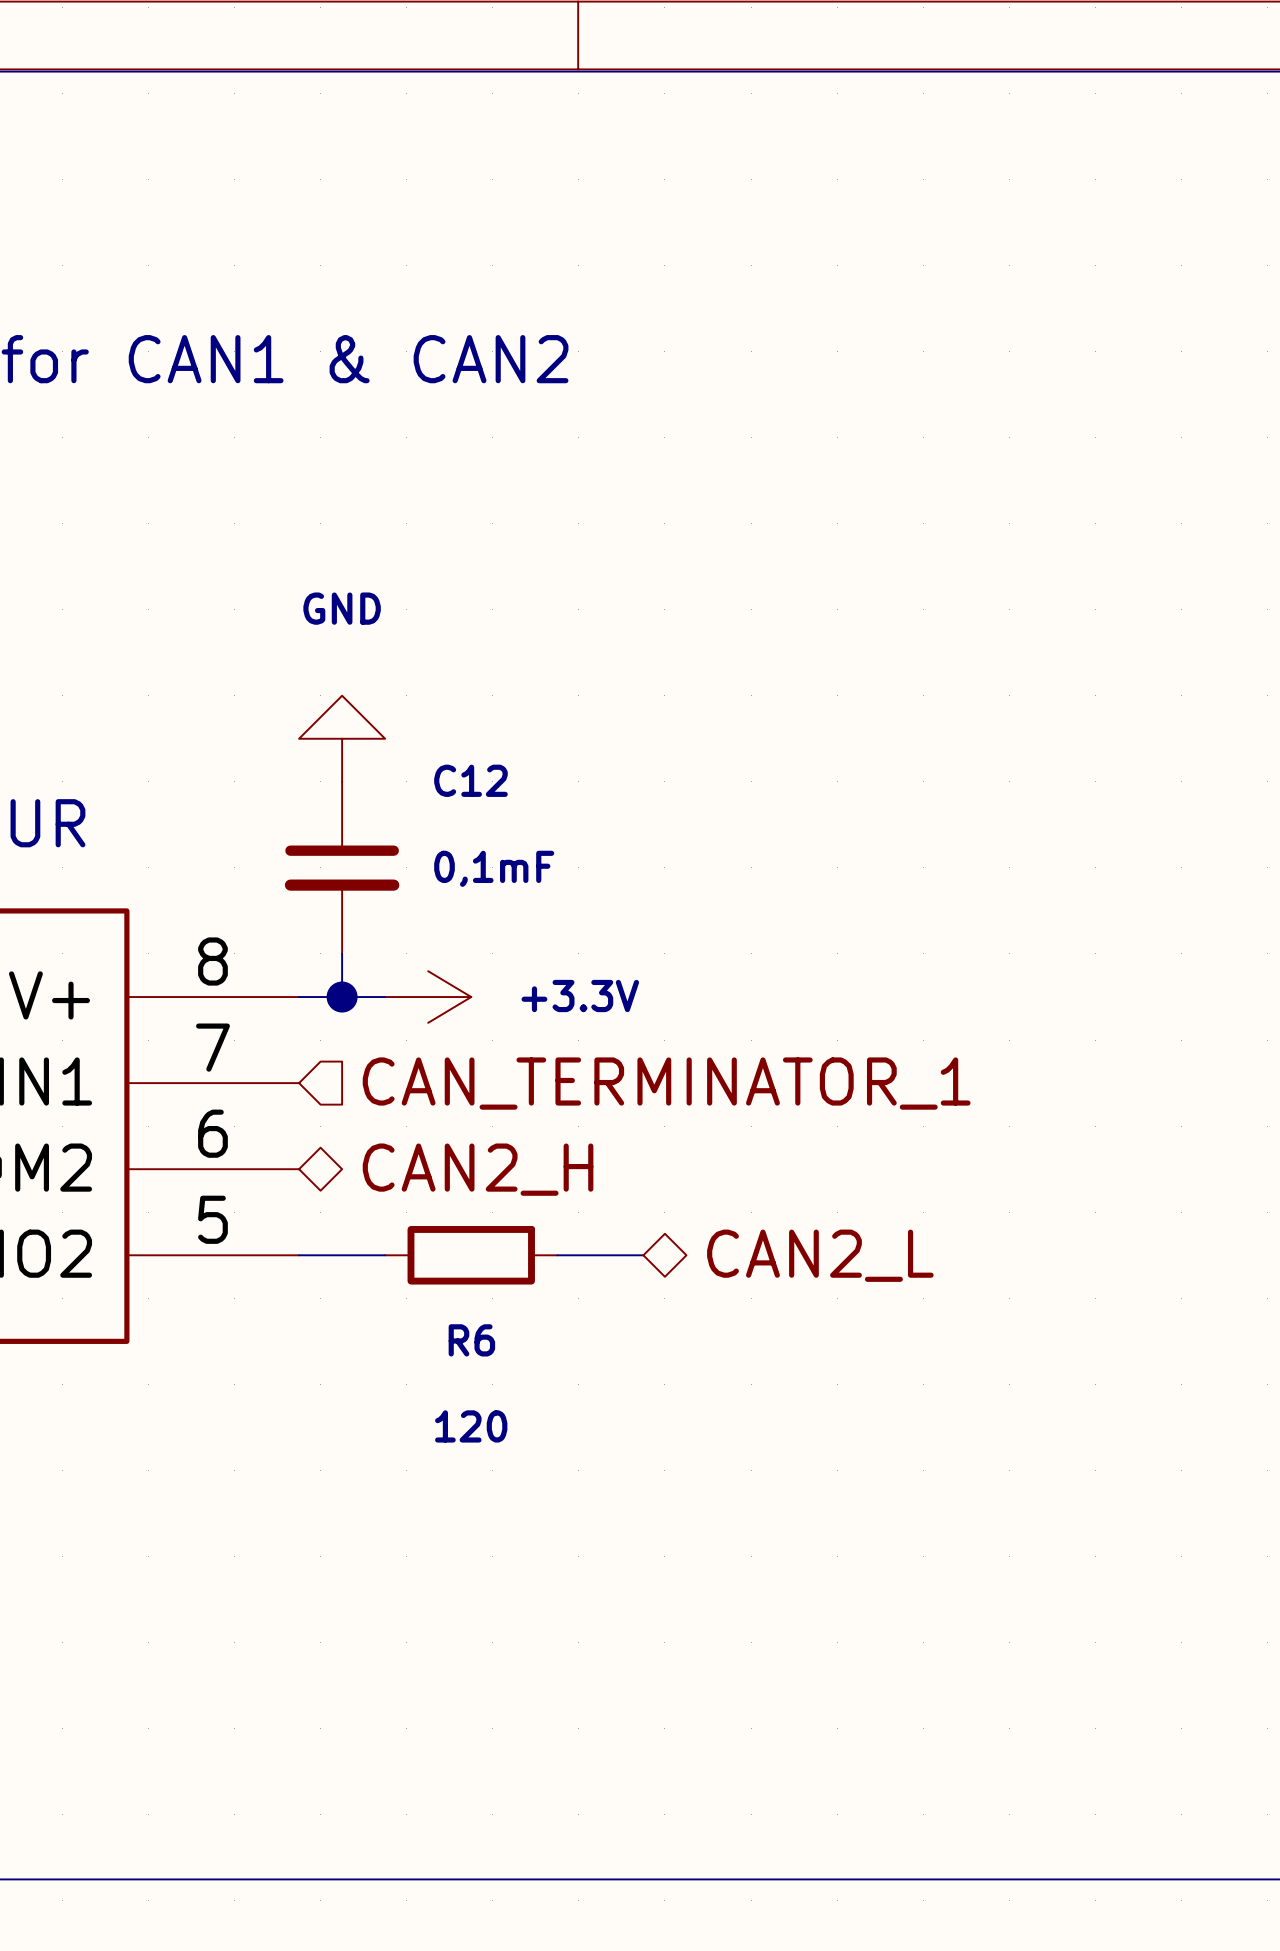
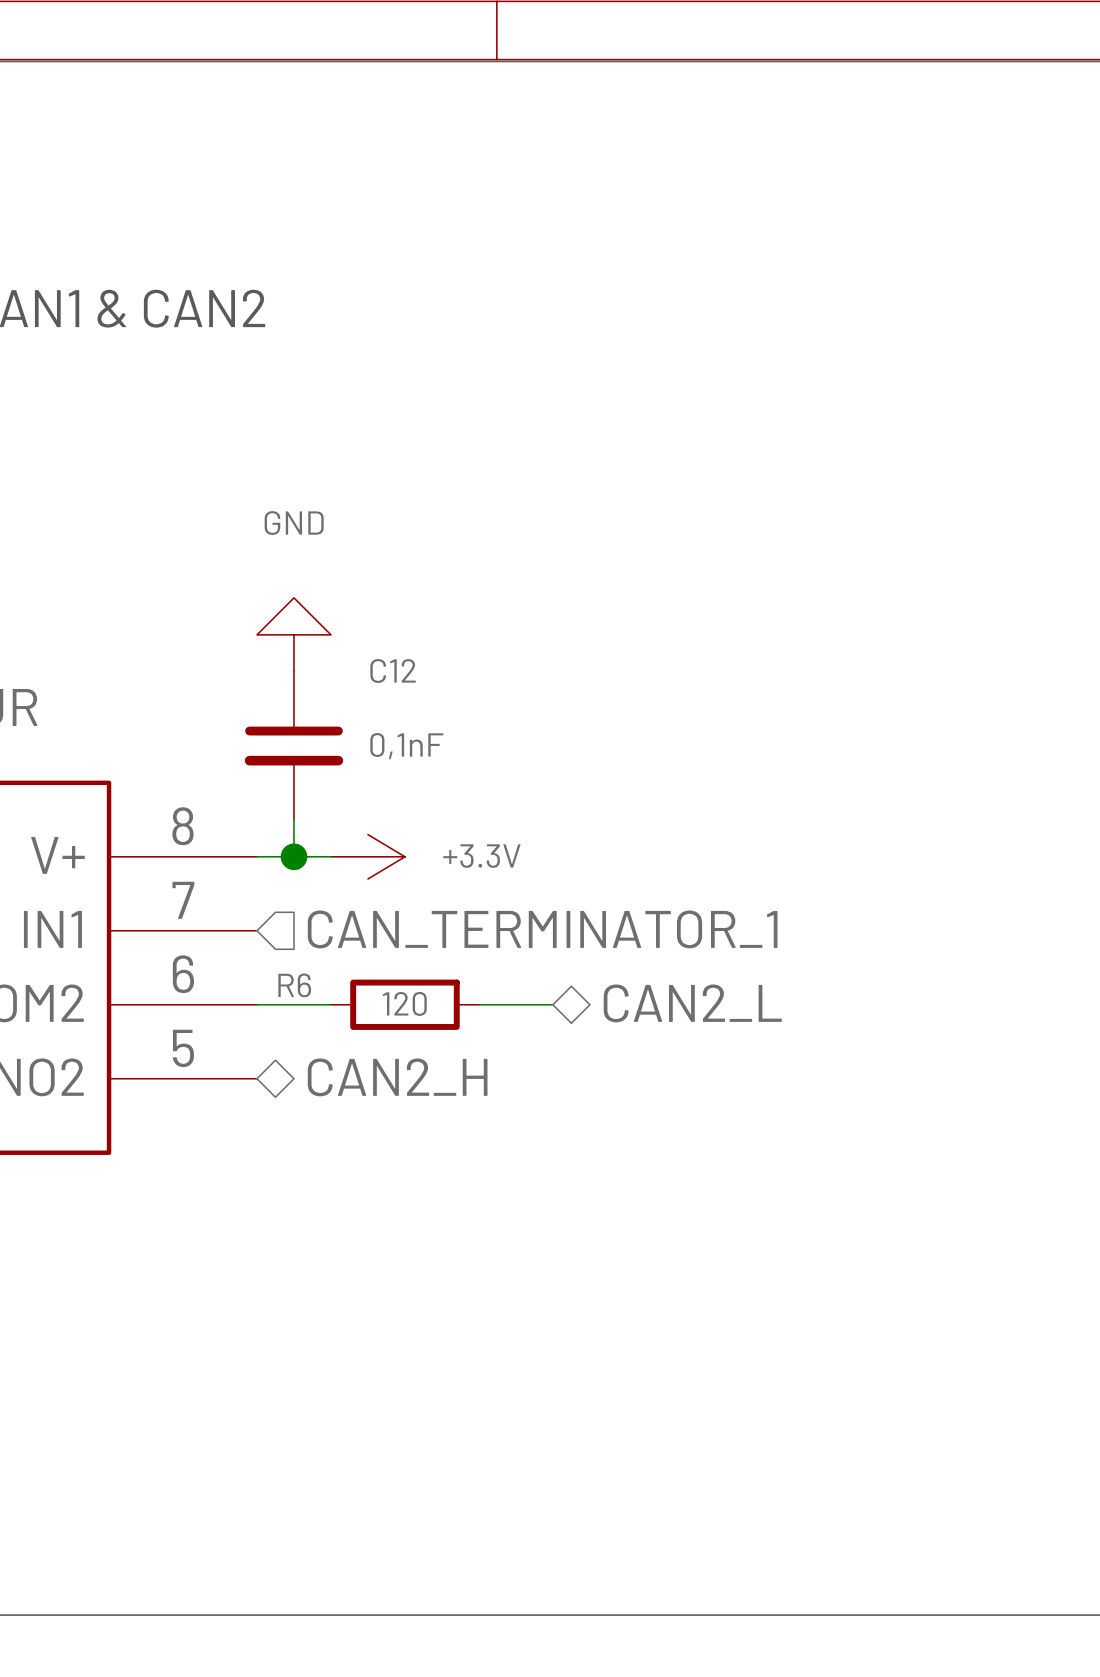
C12 value: 0,1mF (494, 868) -> 0,1nF (406, 746)
hierarchical label position: CAN2_H (478, 1169) -> CAN2_H (397, 1077)
wire: (299, 1255) (385, 1255) -> (257, 1004) (330, 1004)
R6 position: (471, 1255) -> (404, 1004)
wire: (557, 1255) (643, 1255) -> (478, 1004) (552, 1004)
hierarchical label position: CAN2_L (820, 1255) -> CAN2_L (692, 1003)
R6 name position: R6 (471, 1340) -> R6 (294, 985)
R6 value position: 120 (471, 1426) -> 120 (404, 1003)

